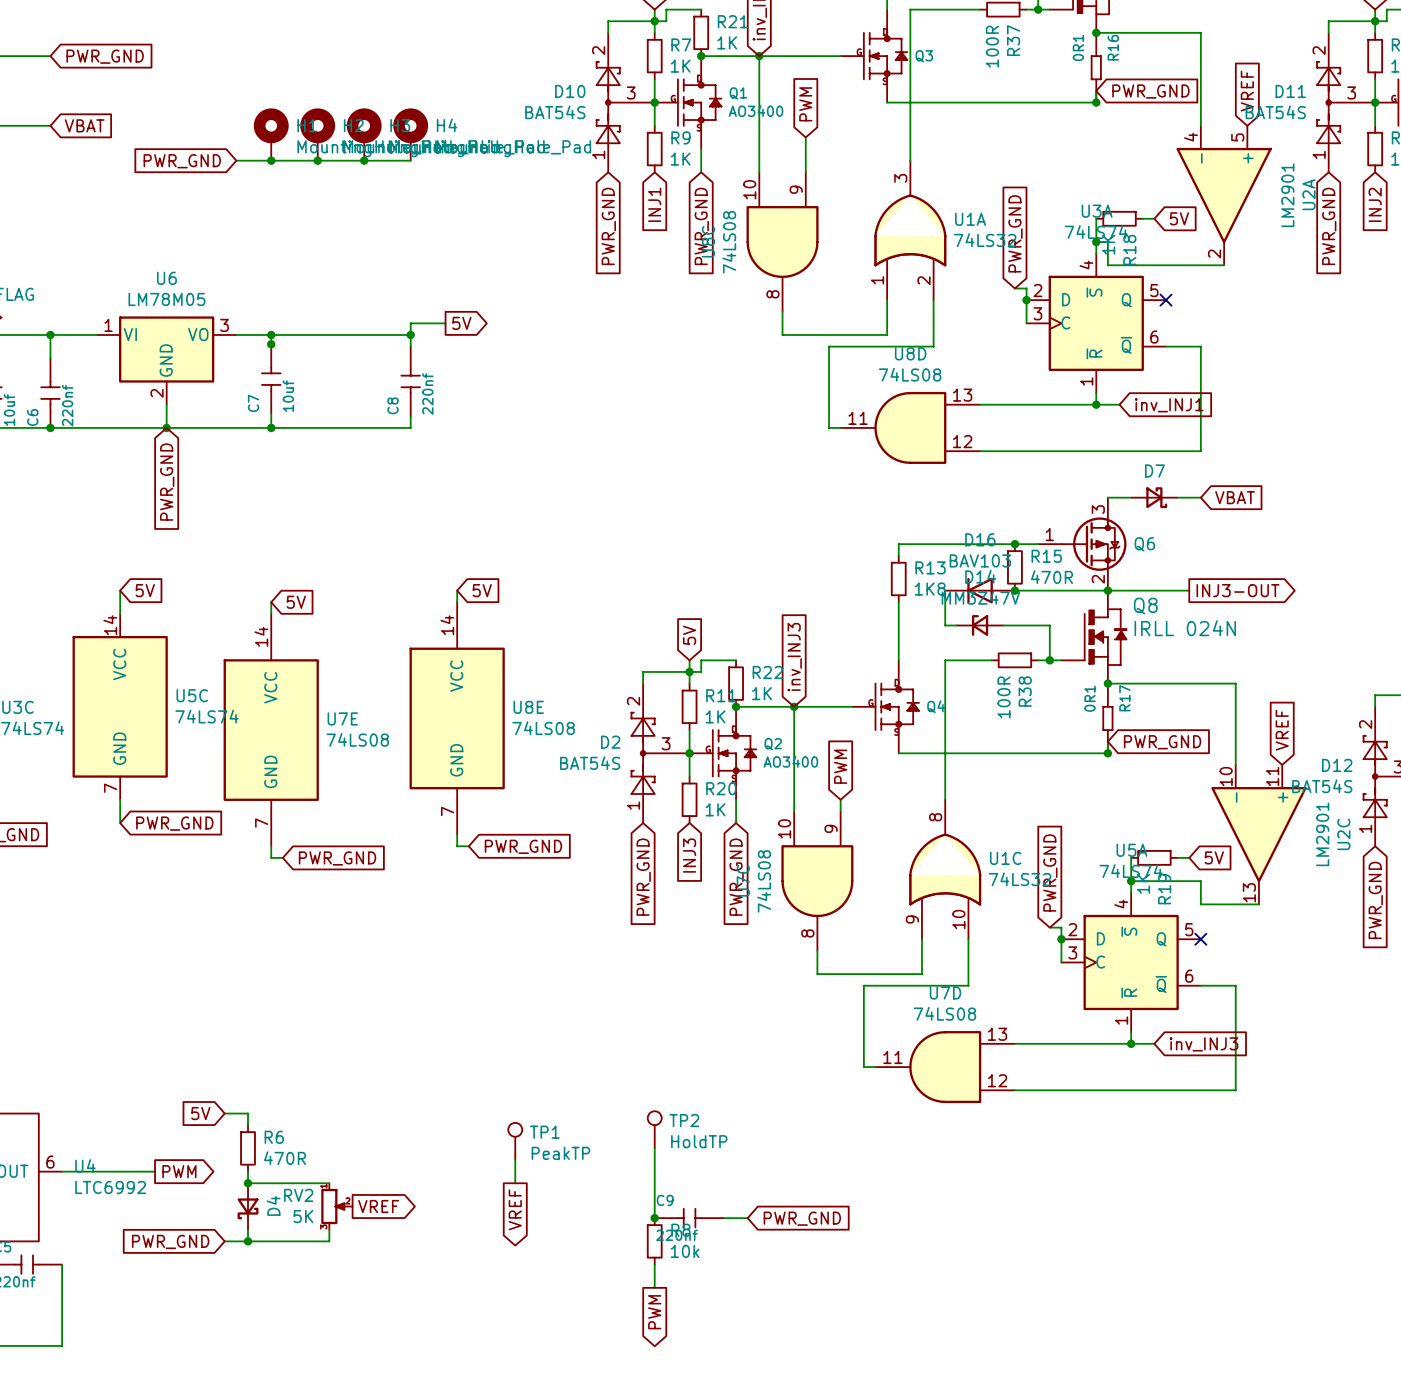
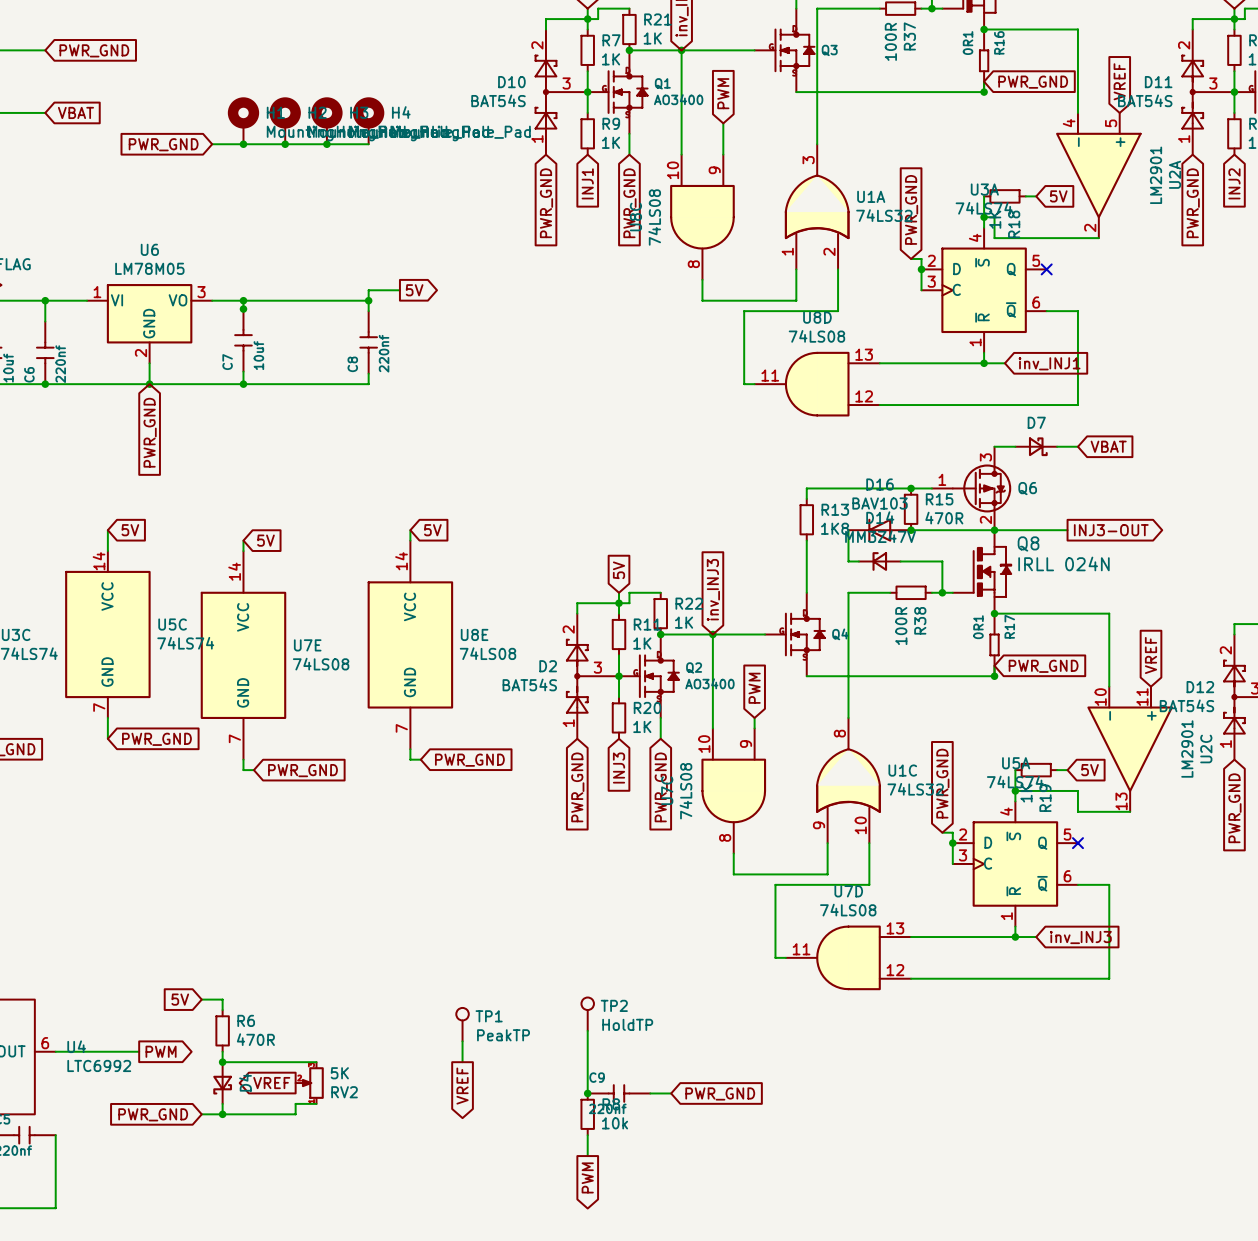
wire: none -> (295, 1062) (316, 1062)
RV2 rotation: 0° (332, 1206) -> 180° (313, 1083)
global label rotation: 0° (378, 1206) -> 180° (271, 1083)
global label position: VREF (378, 1206) -> VREF (271, 1083)
wire: none -> (295, 1103) (316, 1103)

